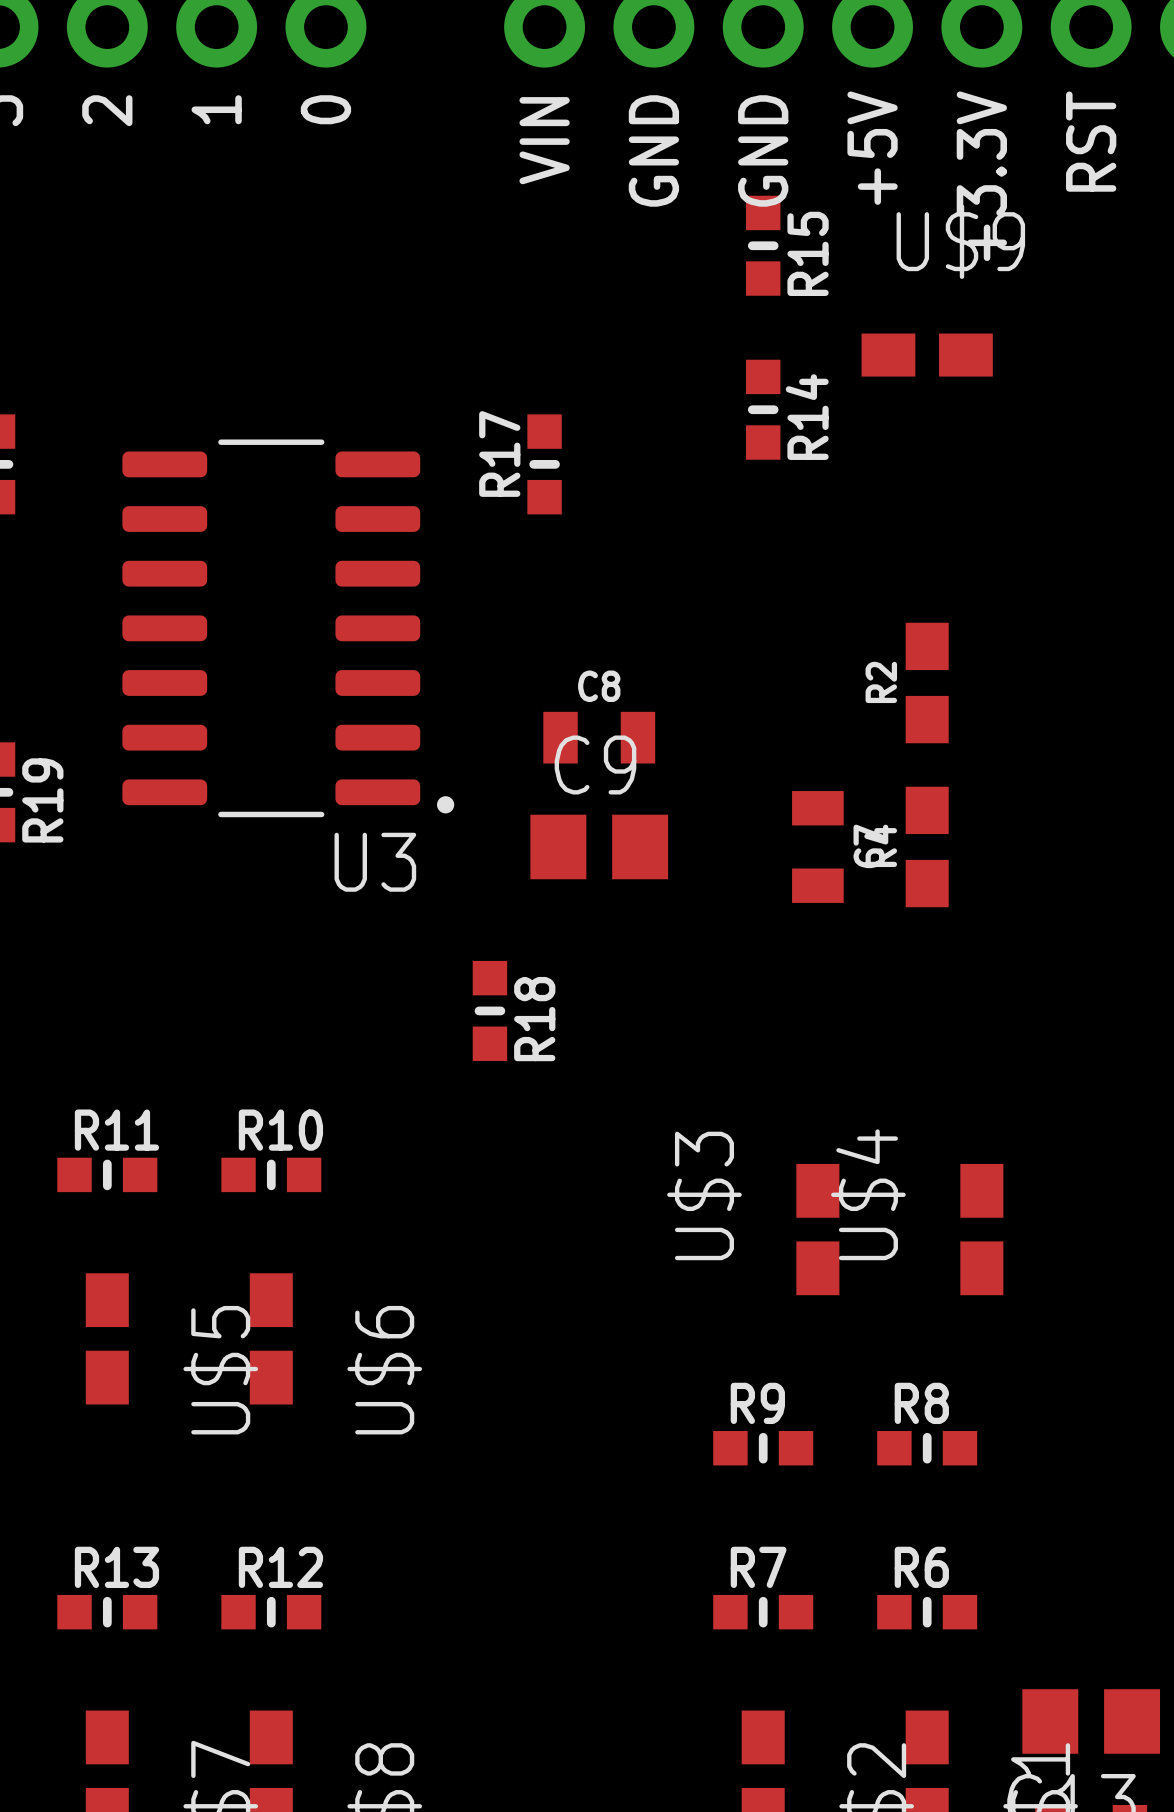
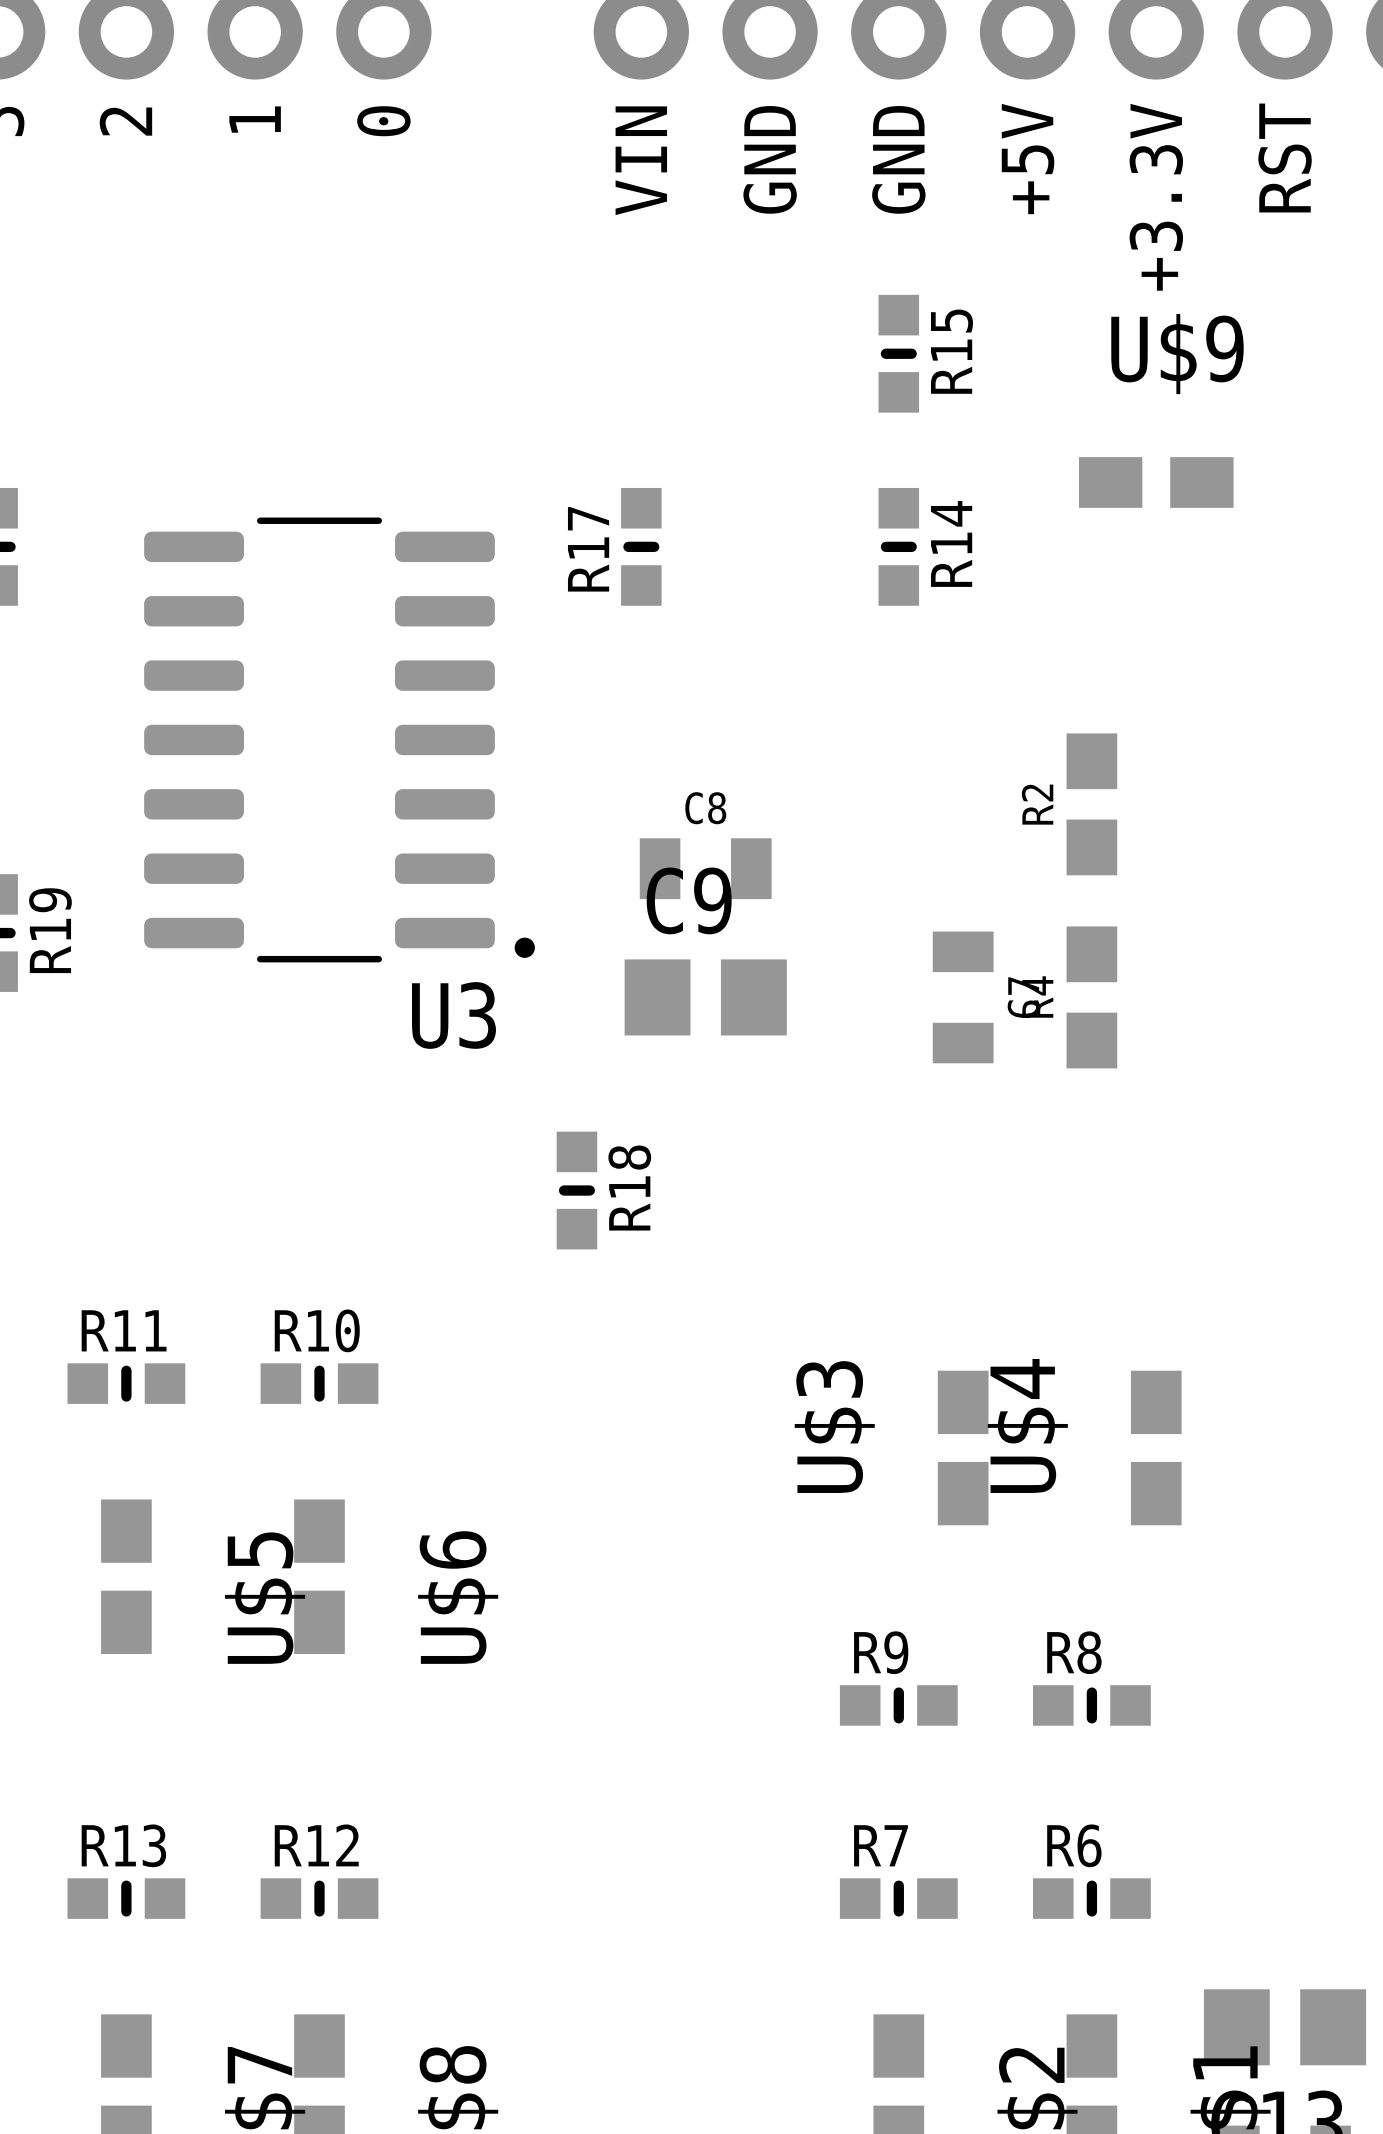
R15 position: (763, 245) -> (898, 353)
U$9 position: (927, 355) -> (1156, 482)
R14 position: (763, 409) -> (898, 546)

